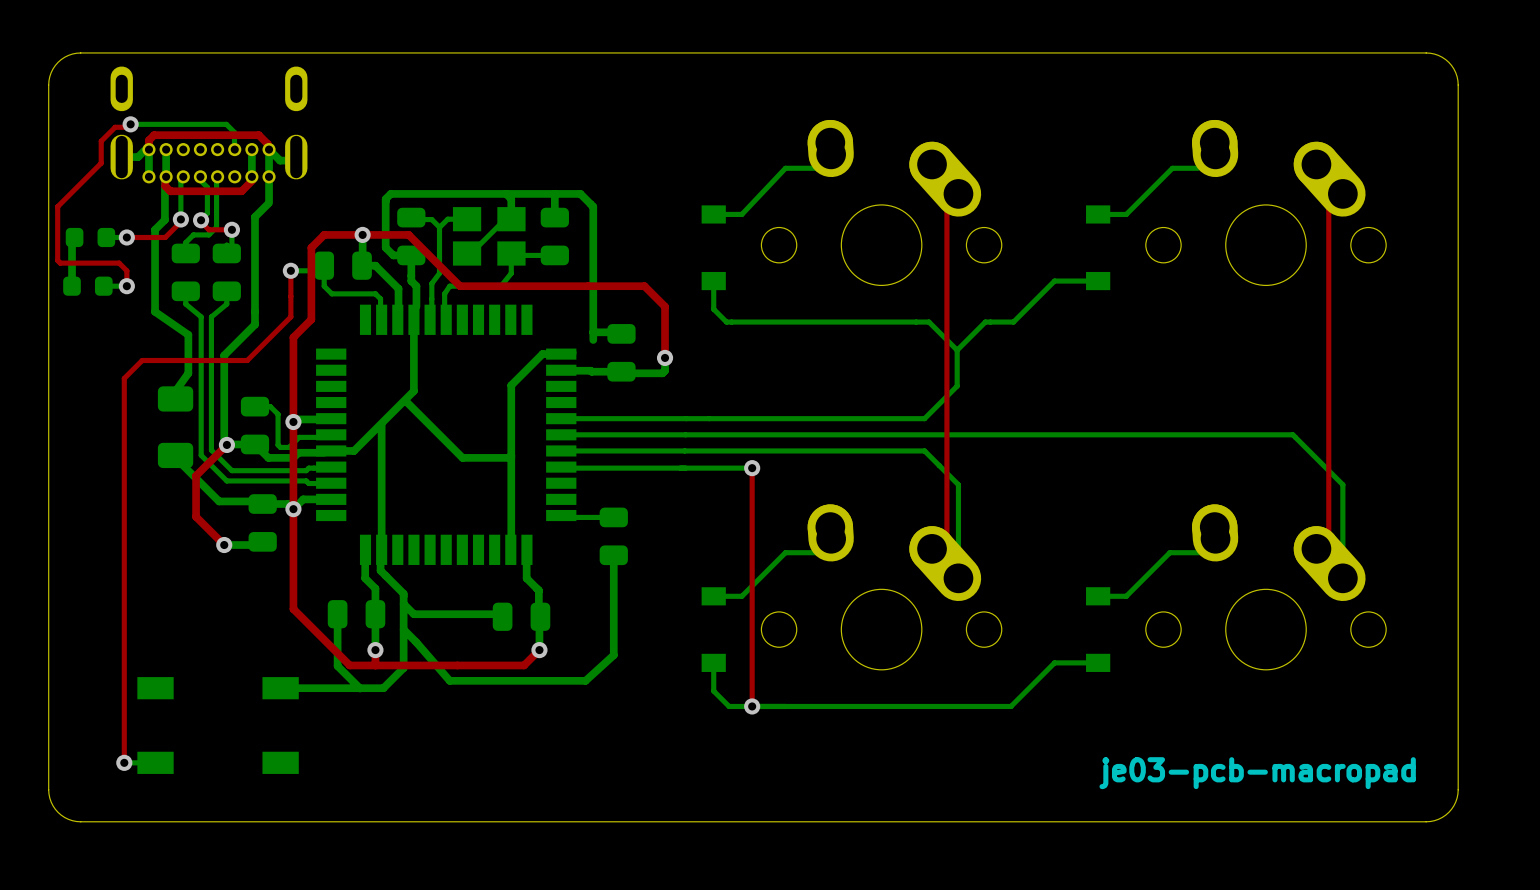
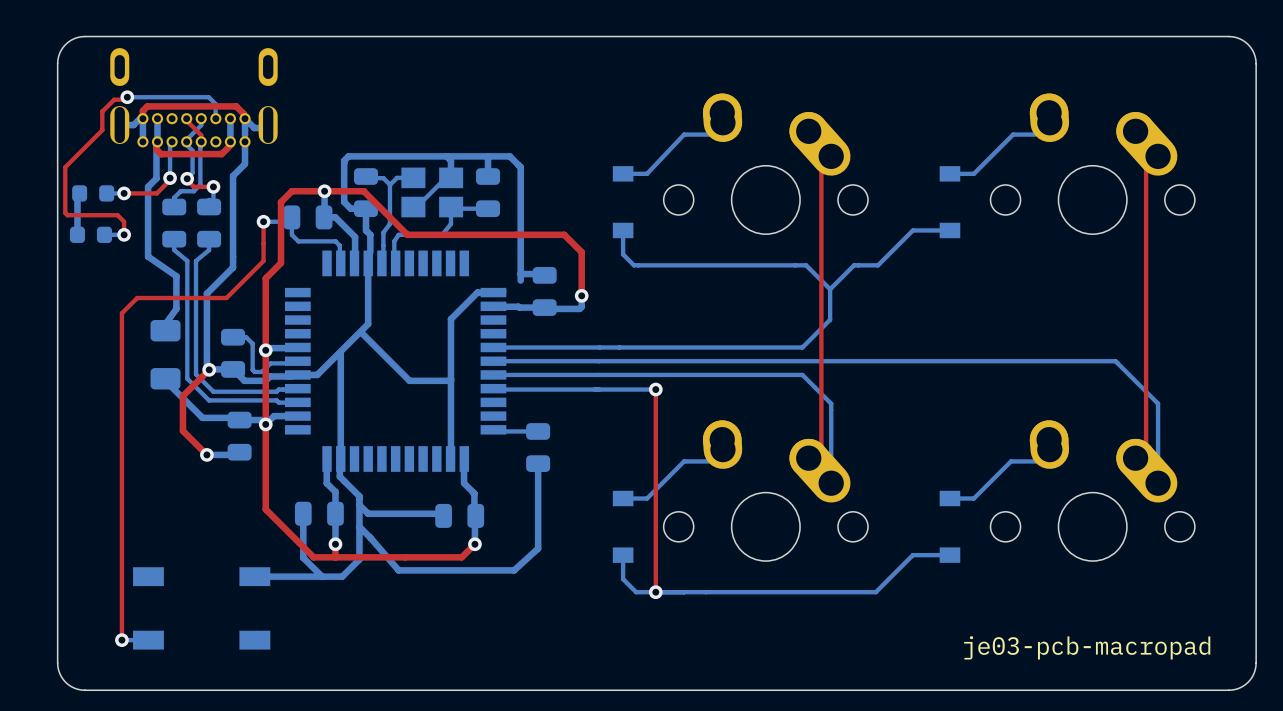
bottom track: none -> (201, 118) (201, 125) (187, 139) (187, 143)
top track: none -> (187, 119) (201, 135) (201, 141)

